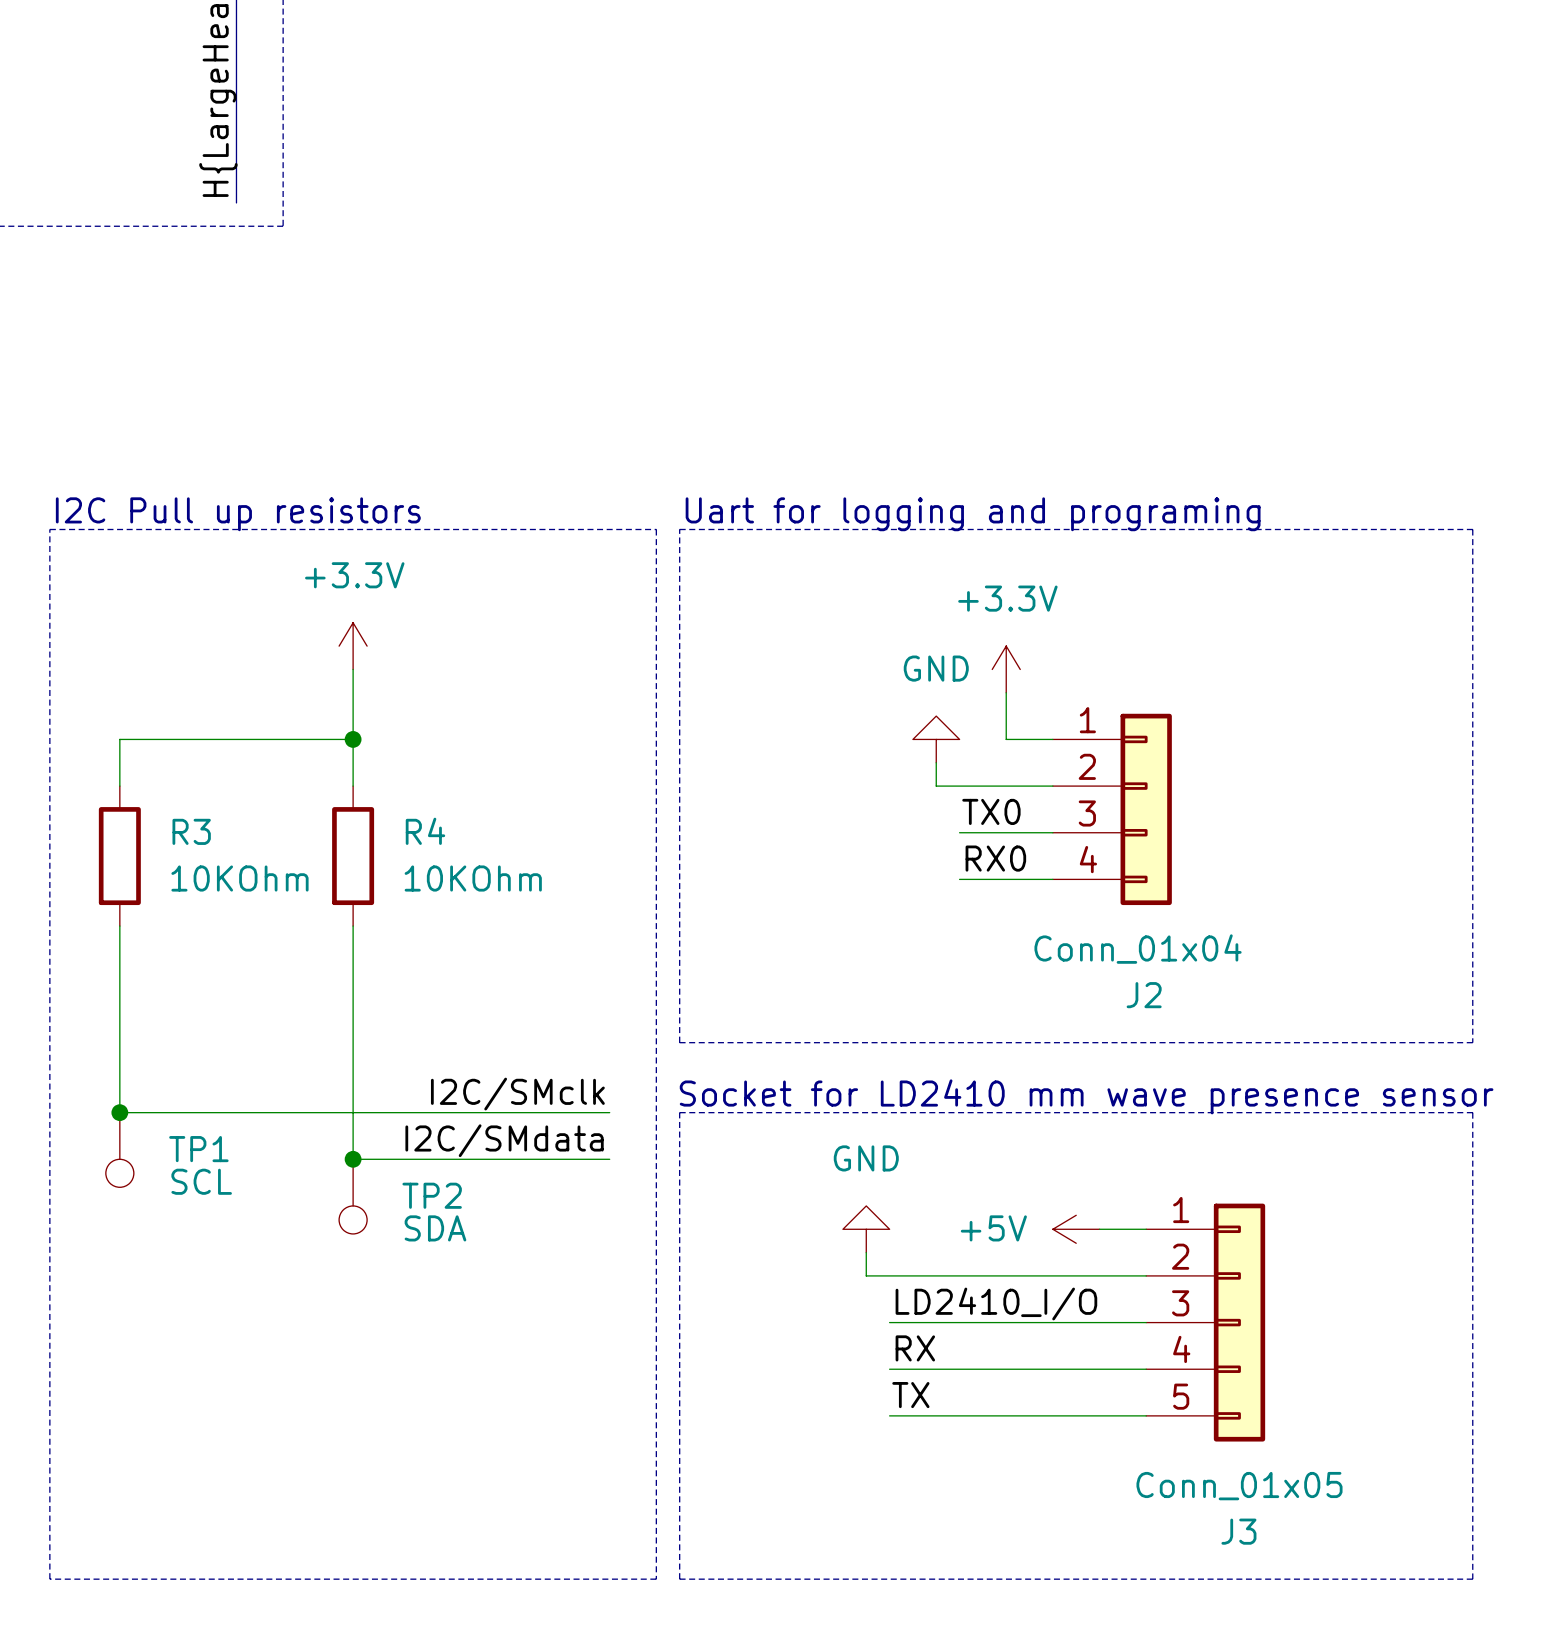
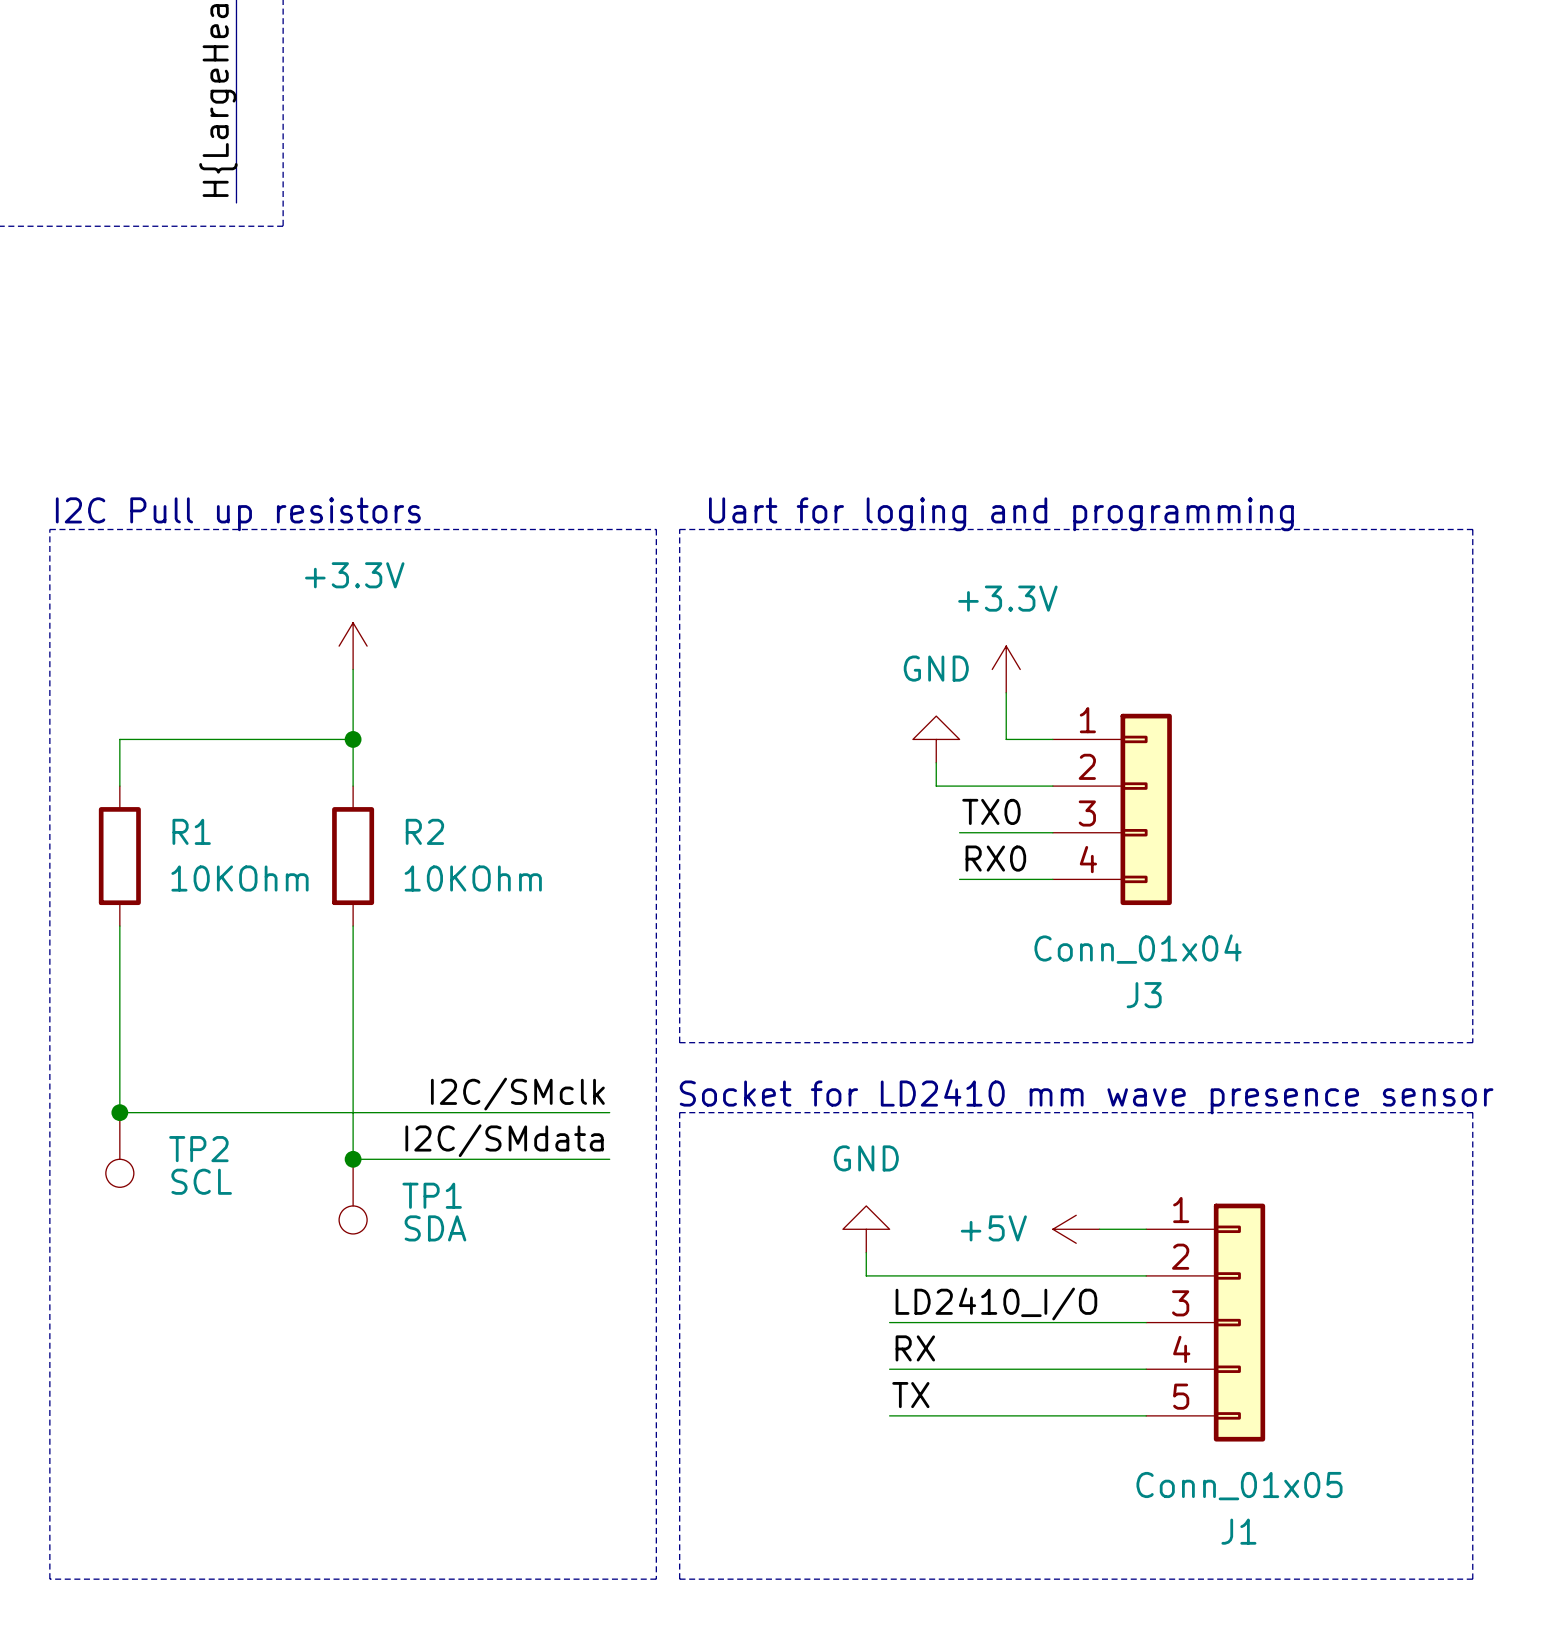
text: Uart for logging and programing (973, 514) -> Uart for loging and programming (1001, 514)
R3 name: R3 (191, 831) -> R1 (191, 831)
R4 name: R4 (425, 831) -> R2 (424, 831)
J2 name: J2 (1144, 995) -> J3 (1144, 995)
TP1 name: TP1 (198, 1149) -> TP2 (198, 1149)
TP2 name: TP2 (432, 1195) -> TP1 (432, 1195)
J3 name: J3 (1238, 1531) -> J1 (1238, 1531)

